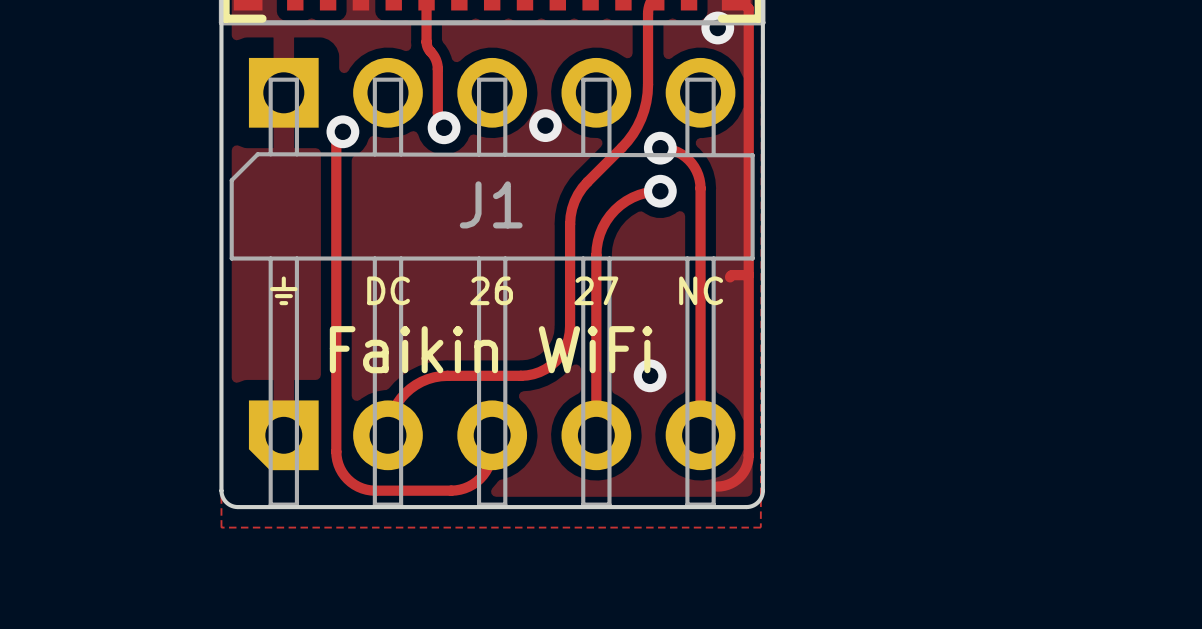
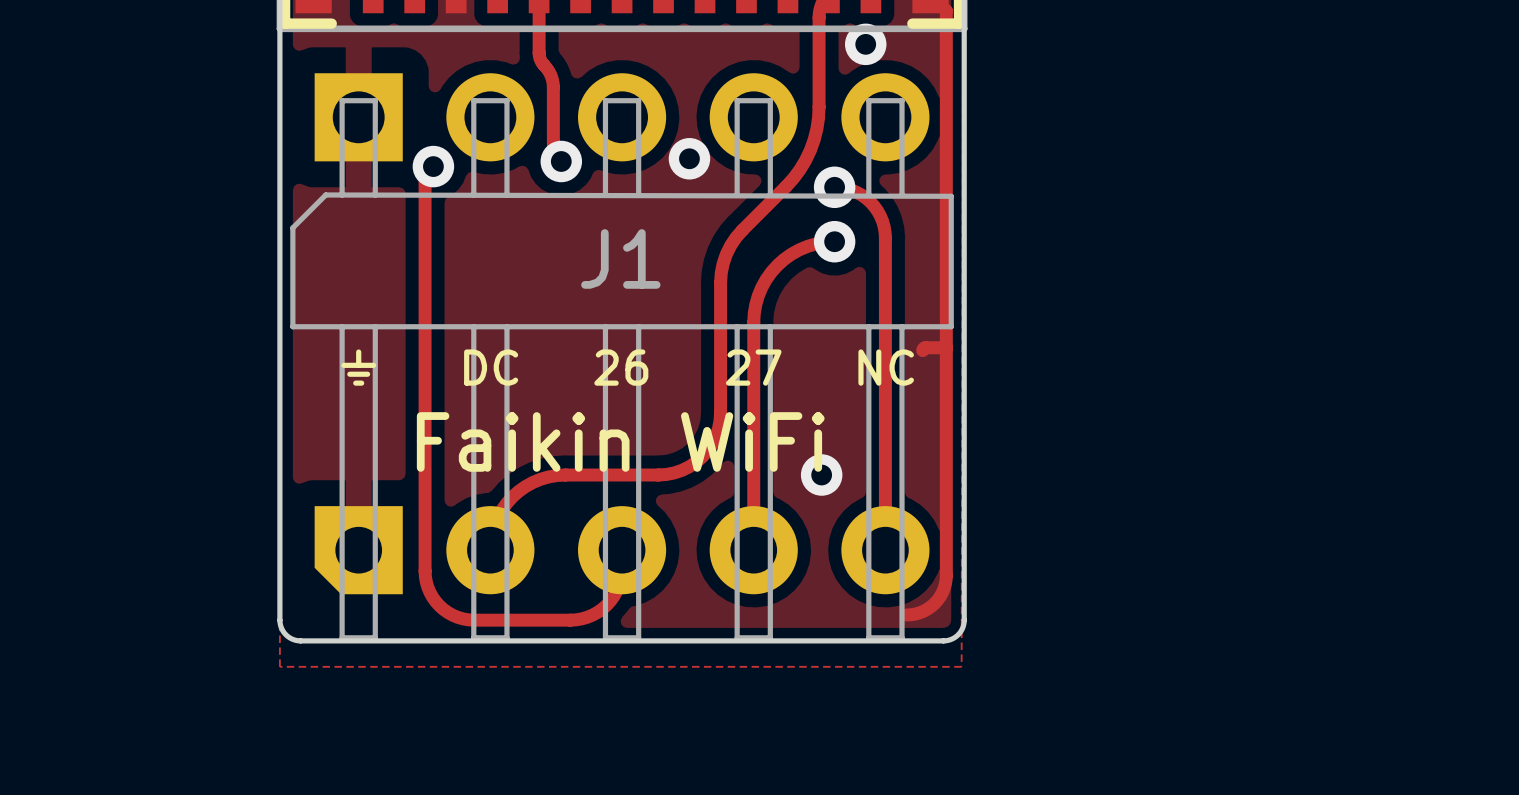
via position: (717, 27) -> (865, 44)

